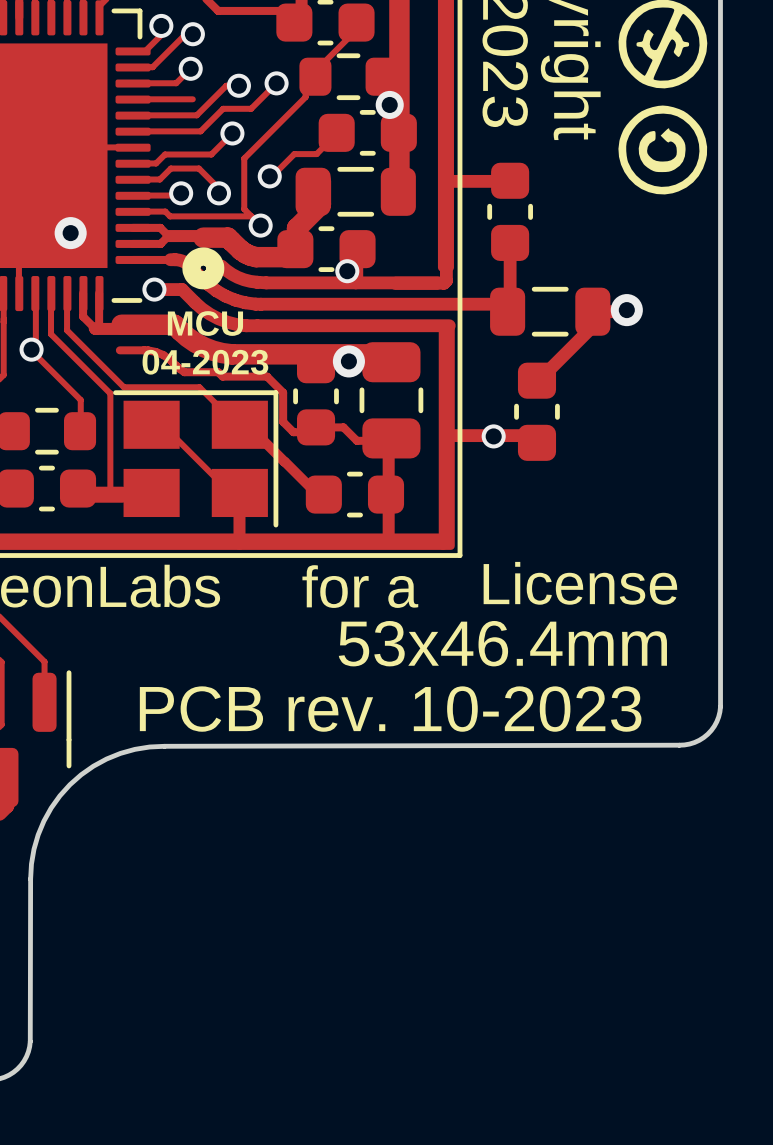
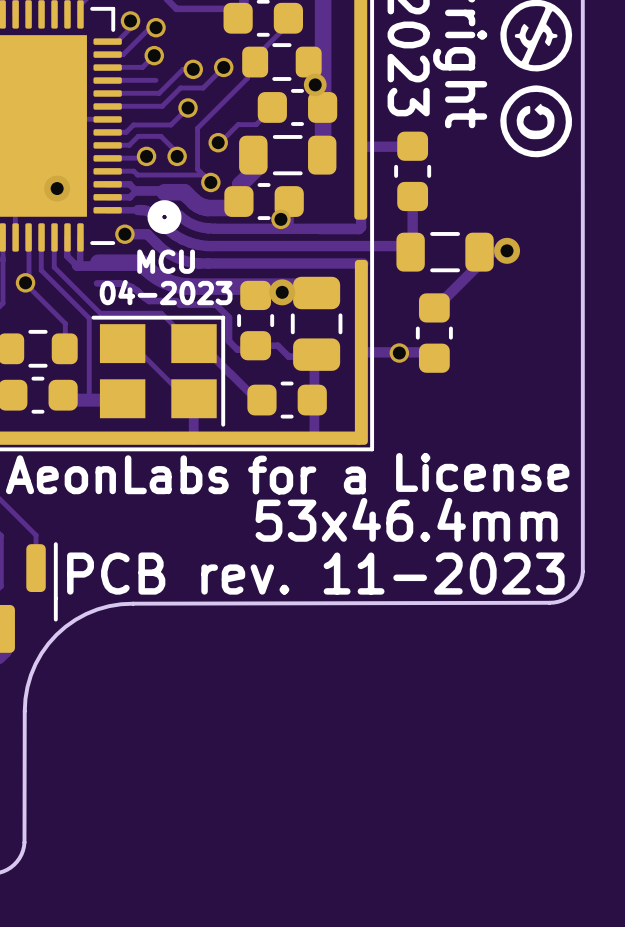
text: PCB rev. 10-2023 (390, 709) -> PCB rev. 11-2023 (315, 573)

